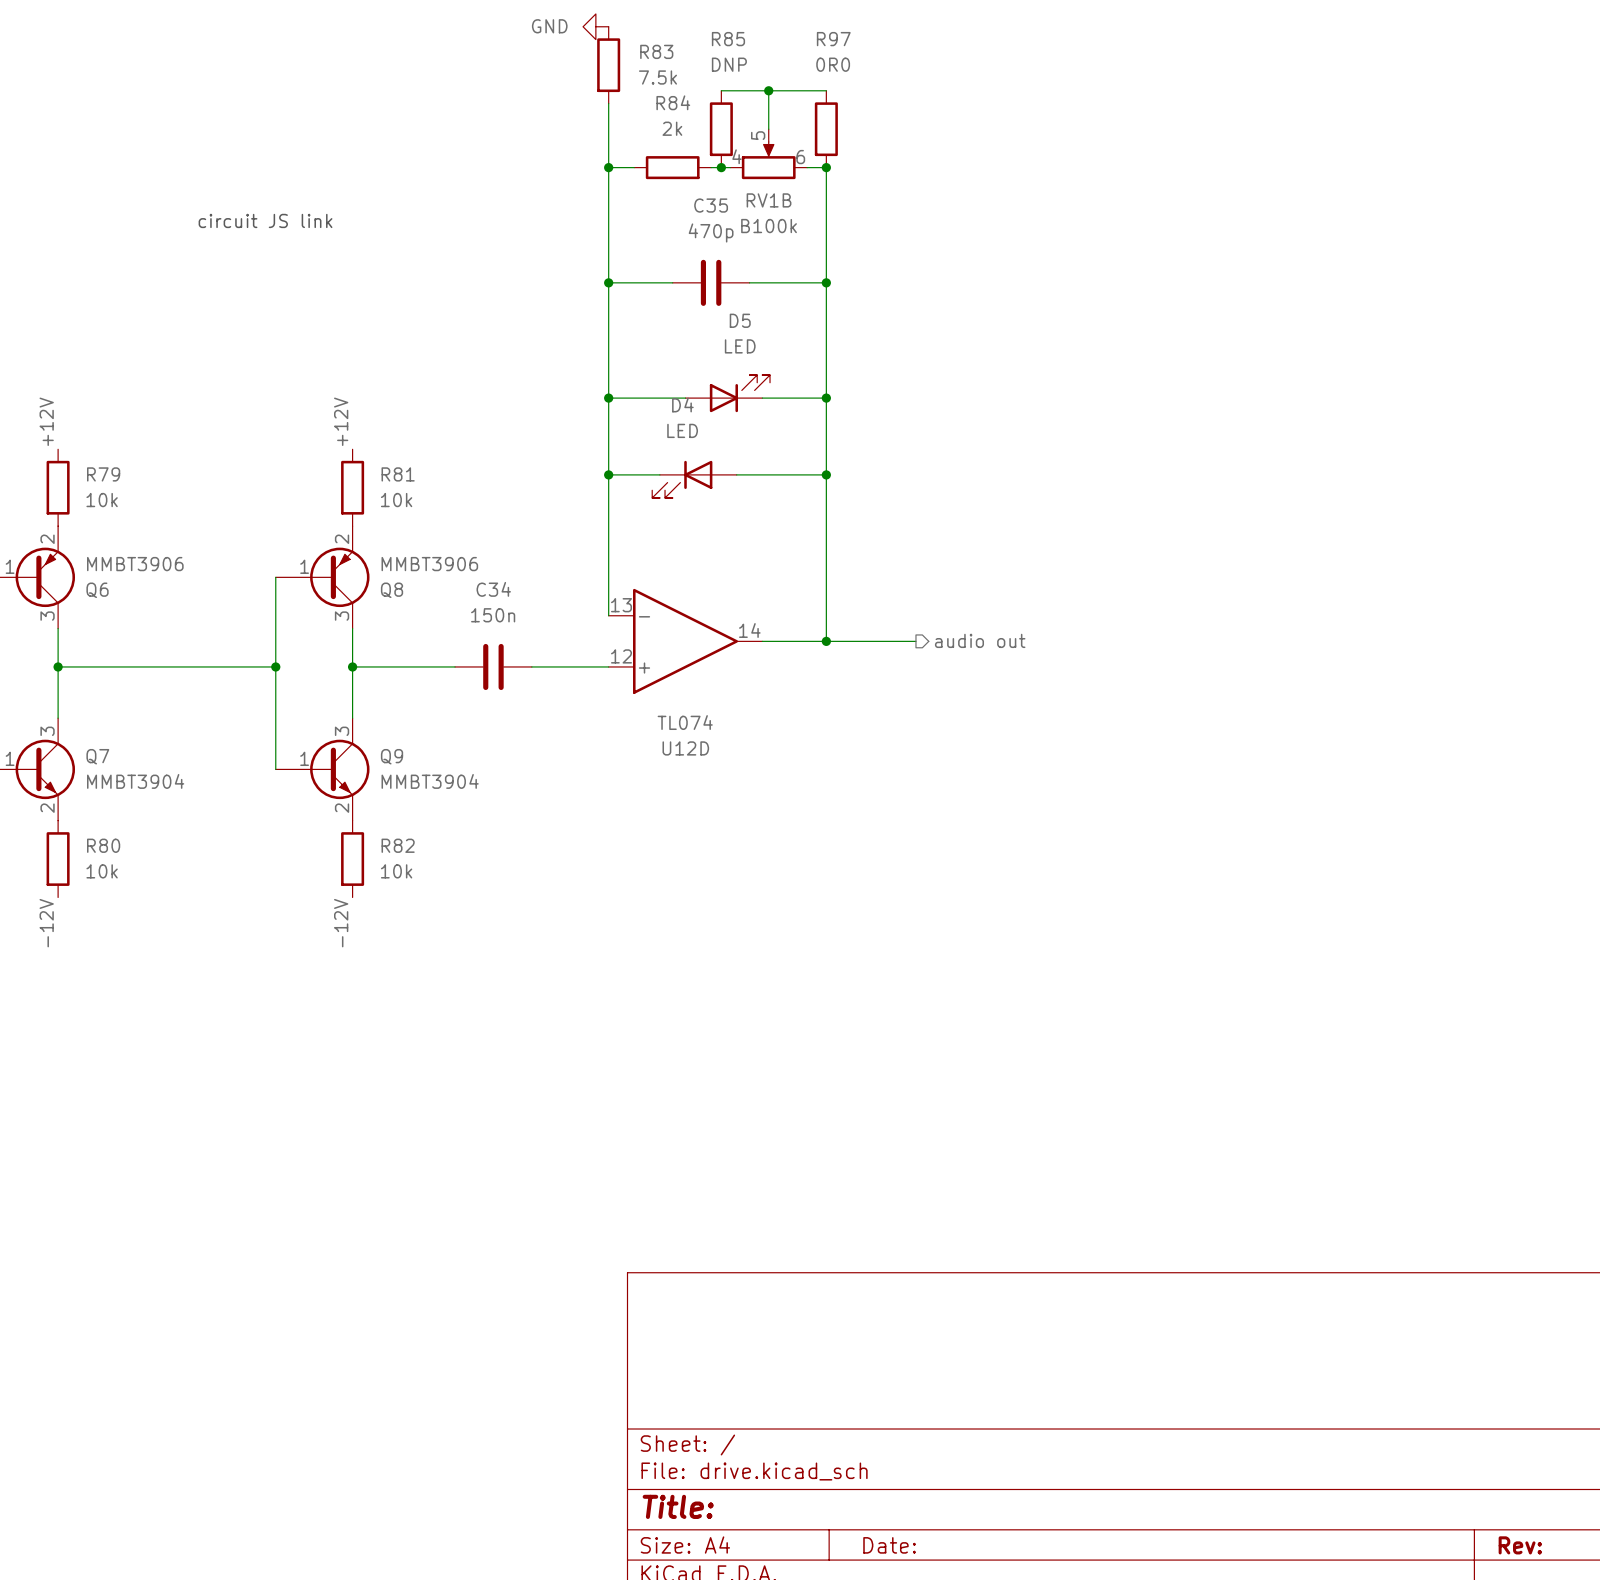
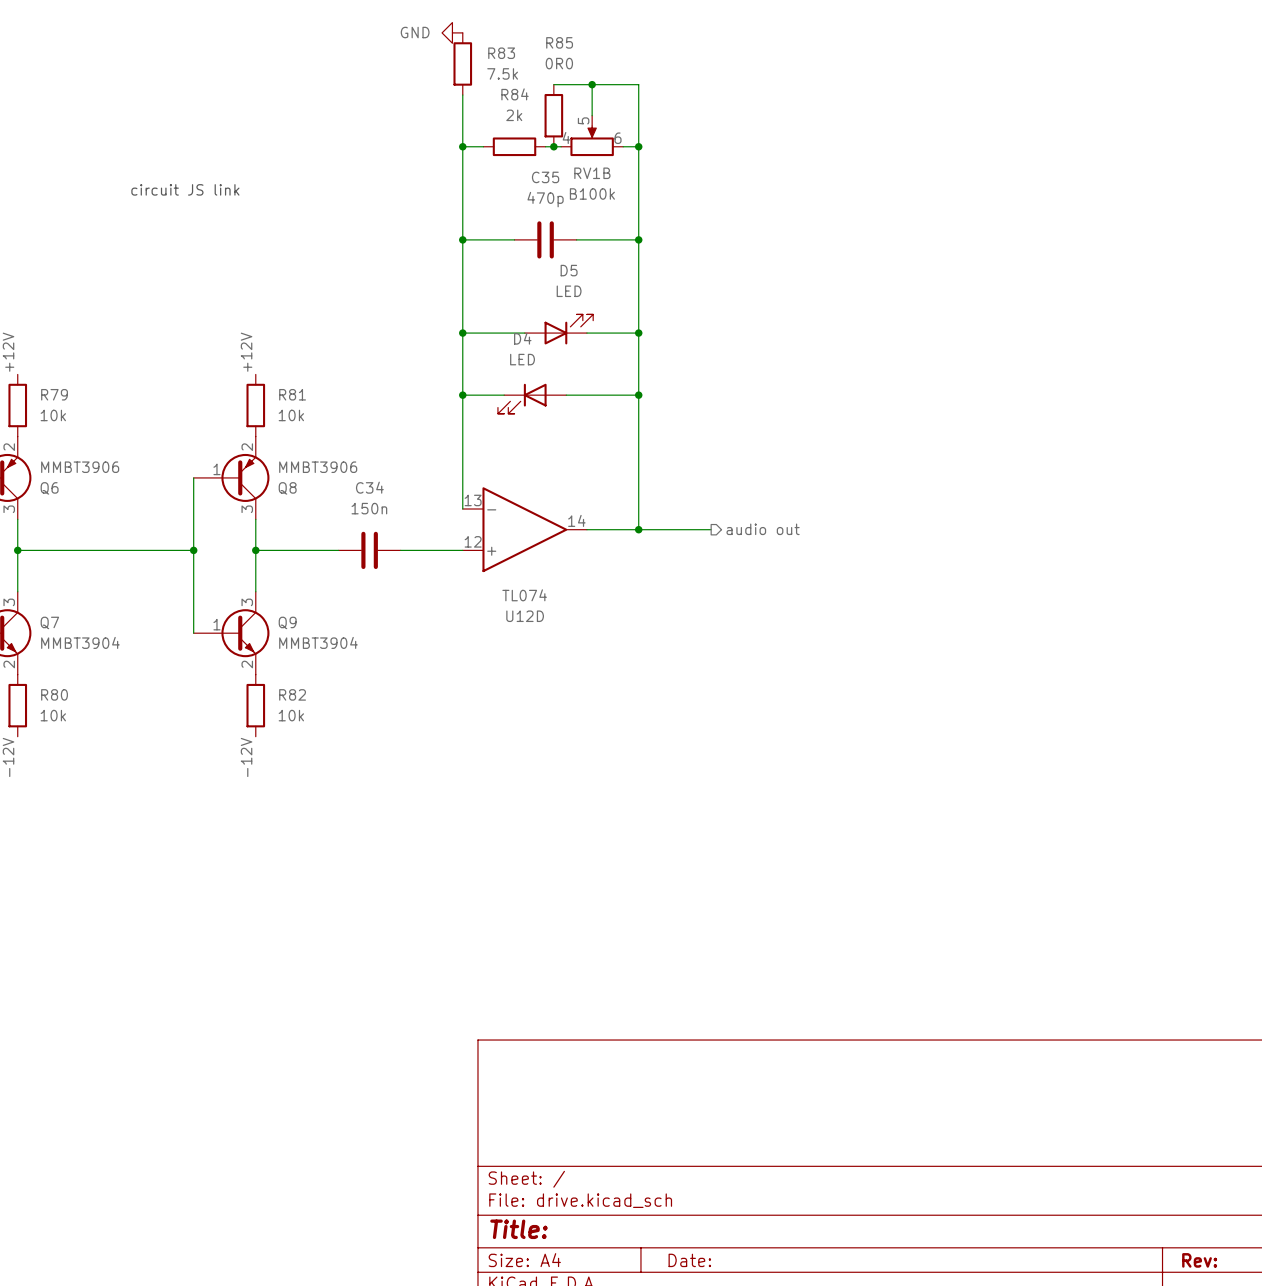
R85 value: DNP (729, 64) -> 0R0 (559, 63)
wire: none -> (638, 84) (638, 146)
R97: 0R0 (826, 129) -> none

